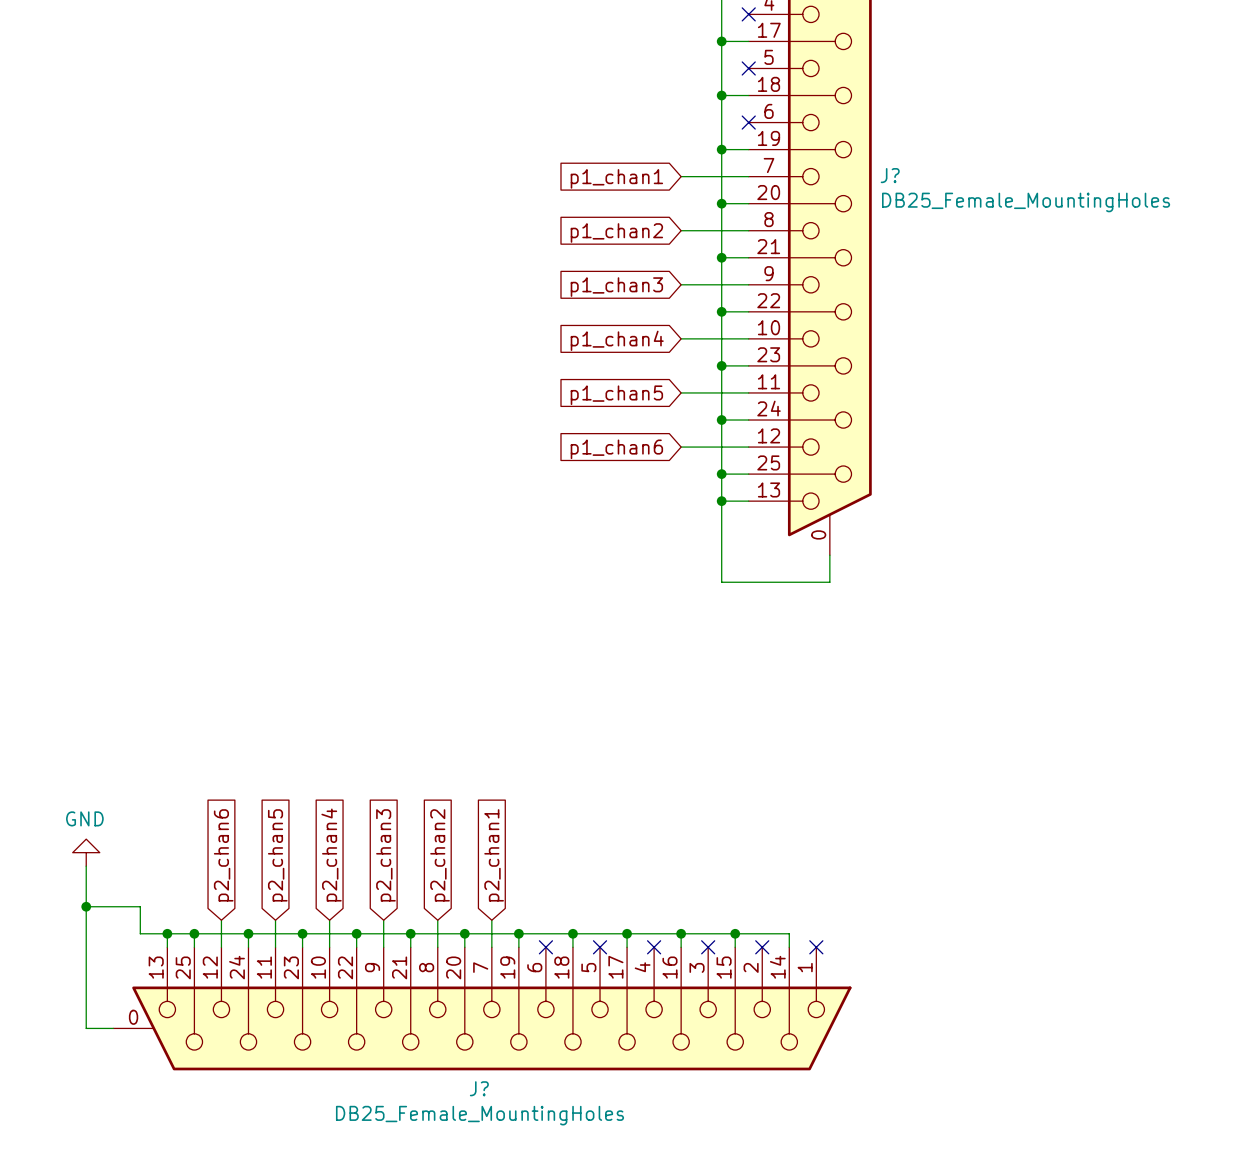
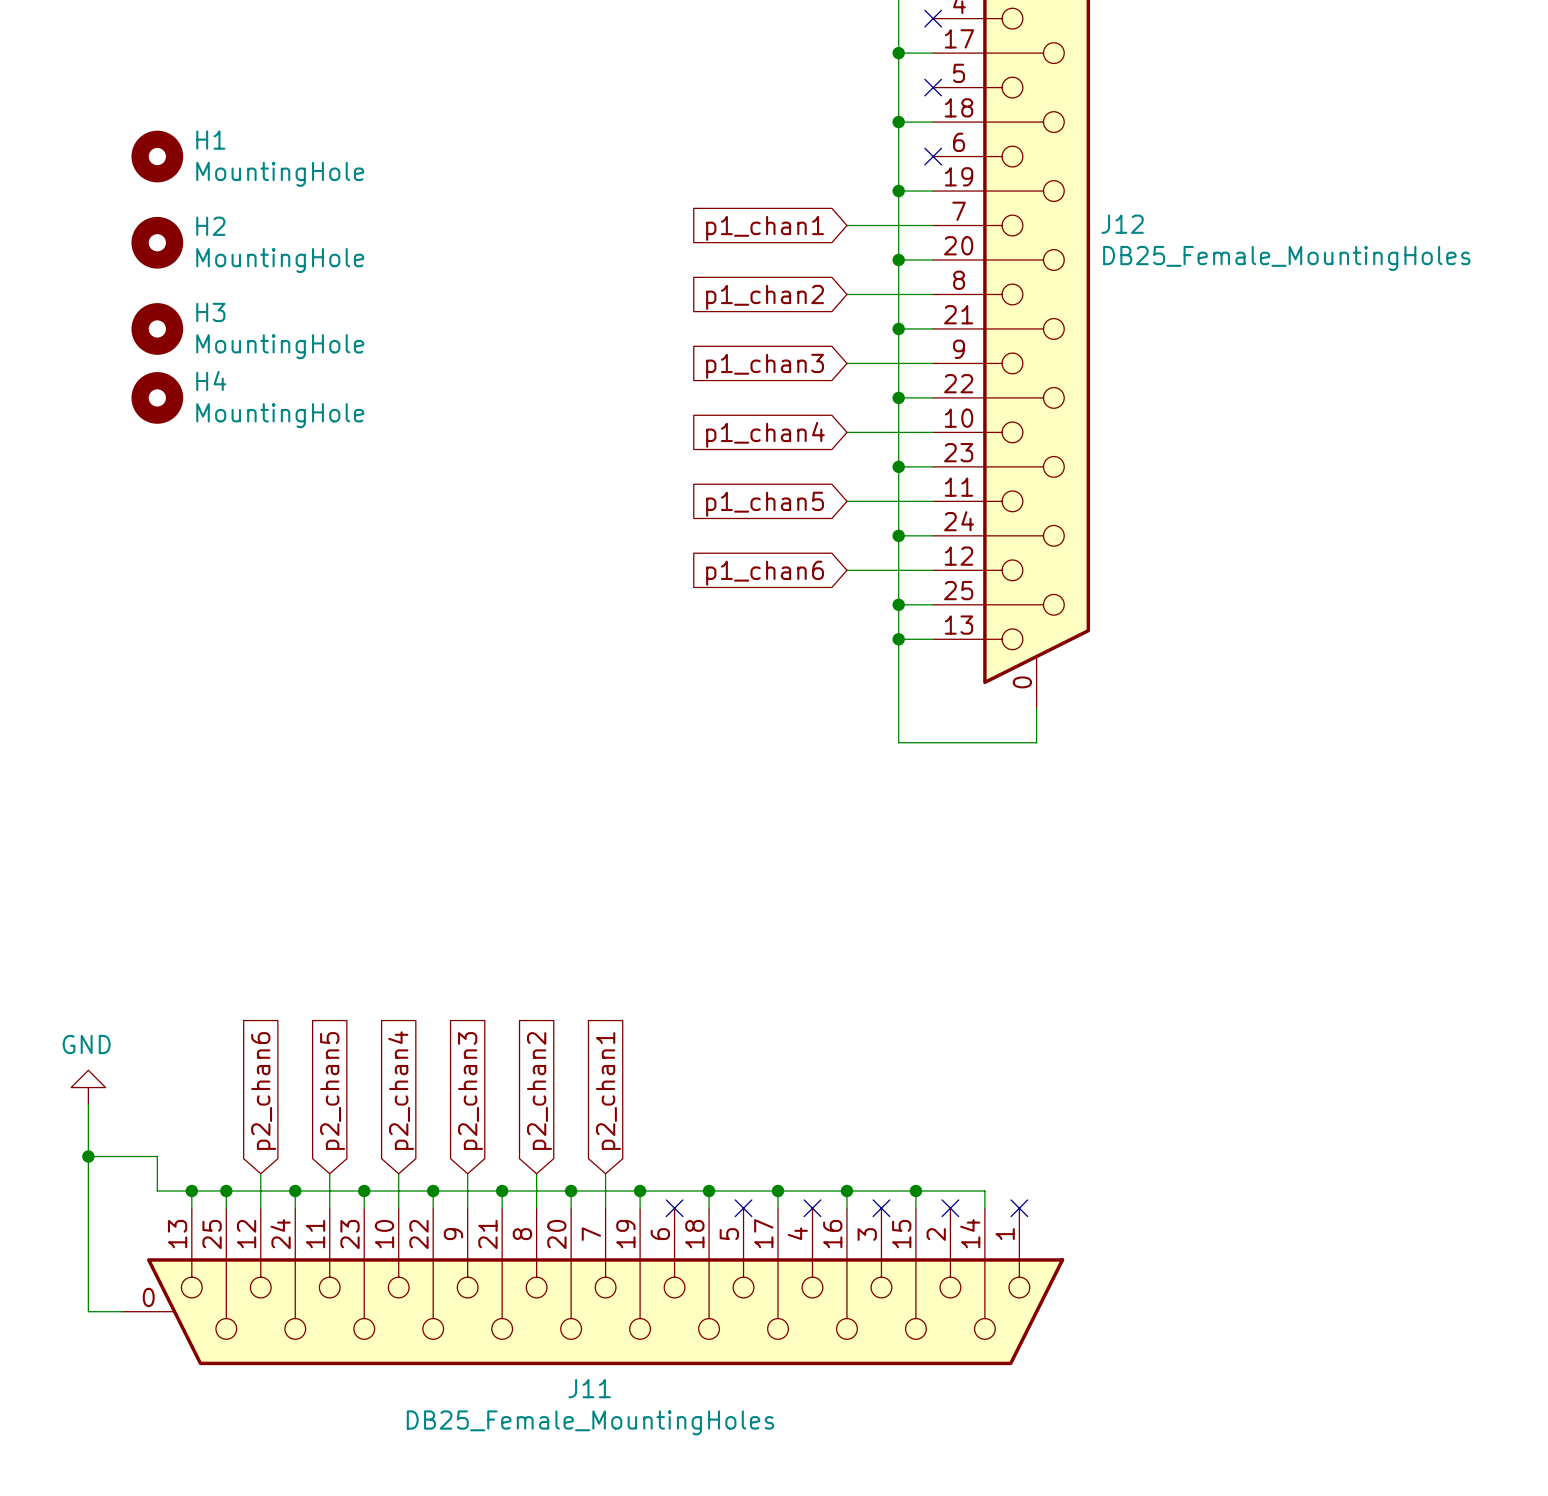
H1: none -> MountingHole (157, 156)
J? name: J? (890, 175) -> J12 (1122, 224)
H2: none -> MountingHole (157, 242)
H3: none -> MountingHole (157, 328)
H4: none -> MountingHole (157, 397)
J? name: J? (479, 1088) -> J11 (589, 1388)

